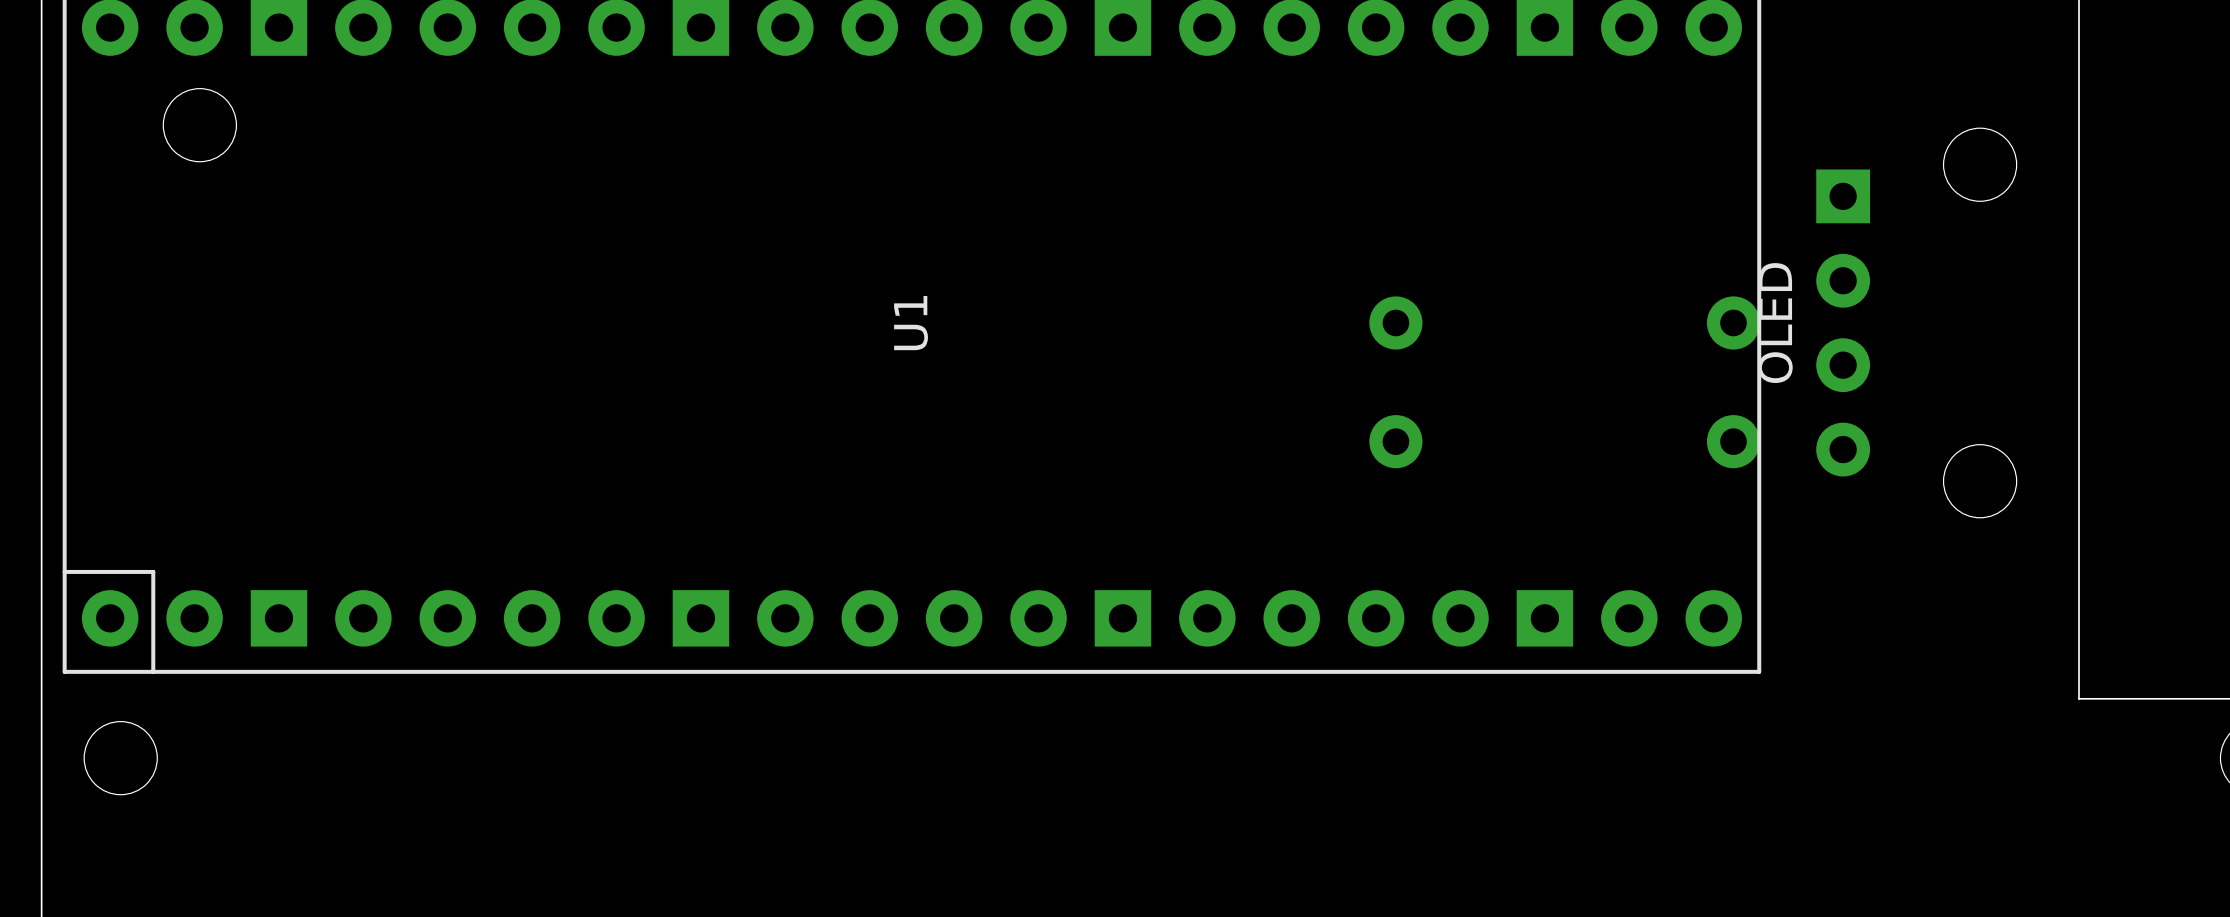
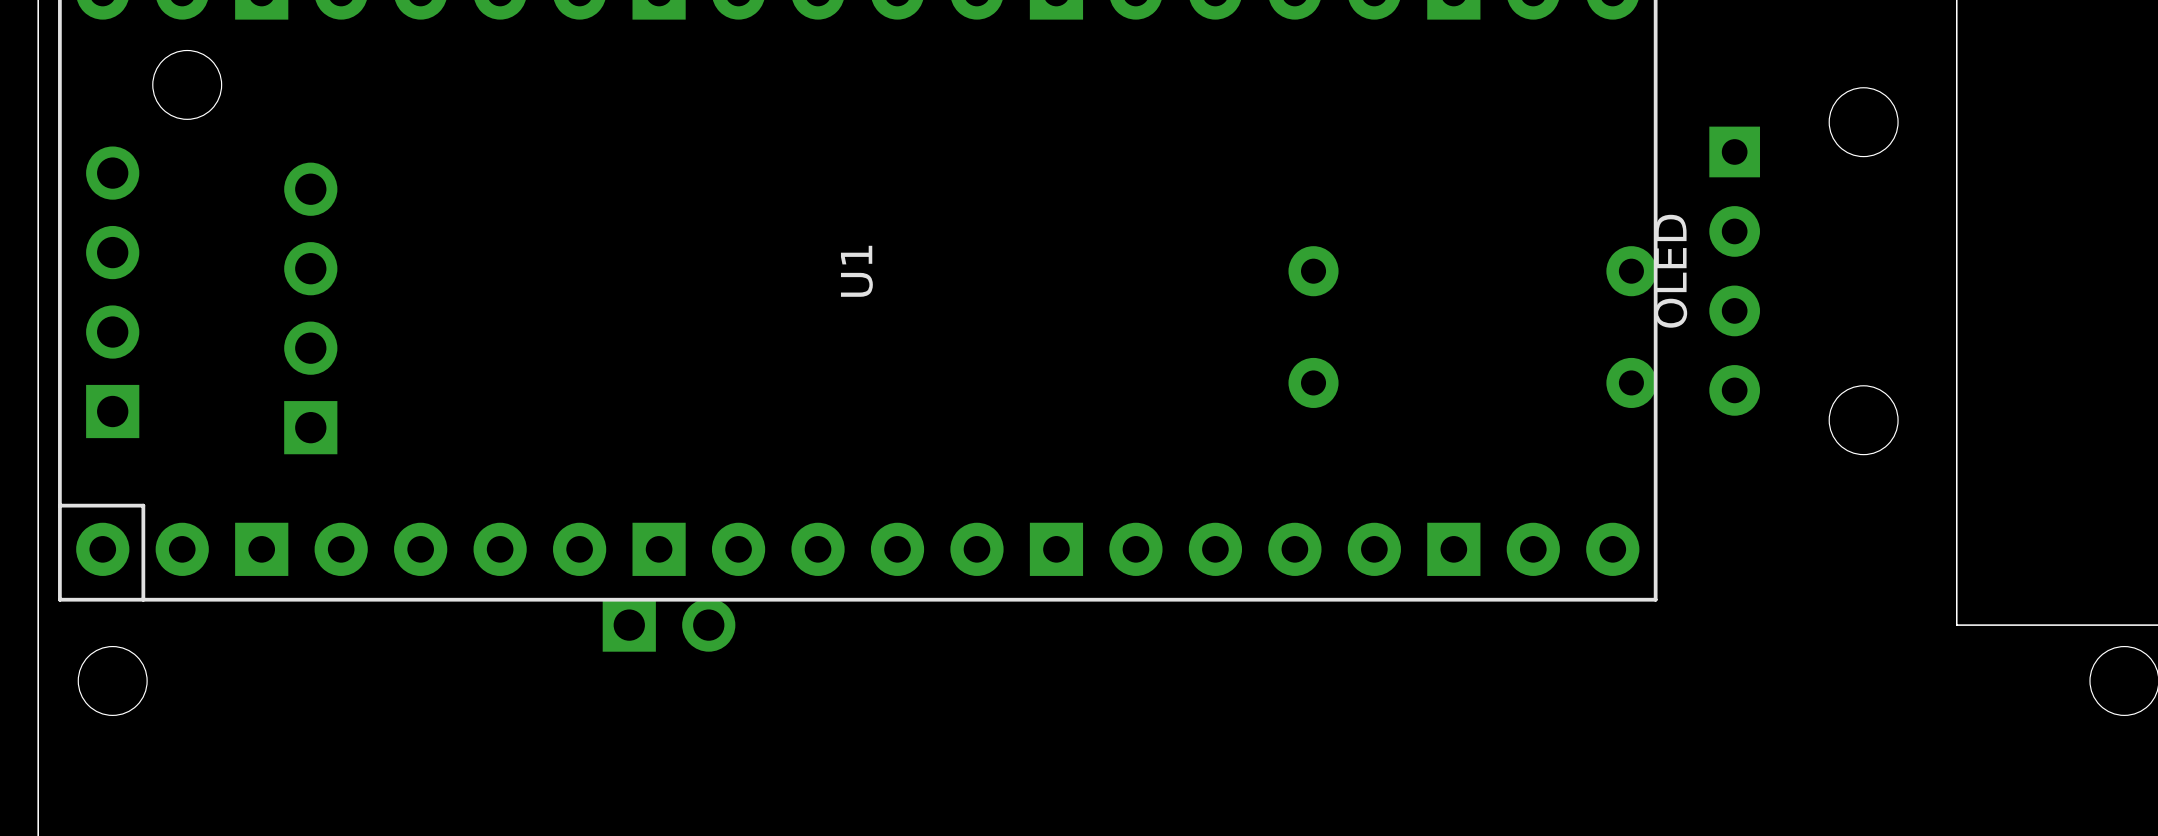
part: none -> (112, 292)
part: none -> (310, 308)
part: none -> (669, 625)

